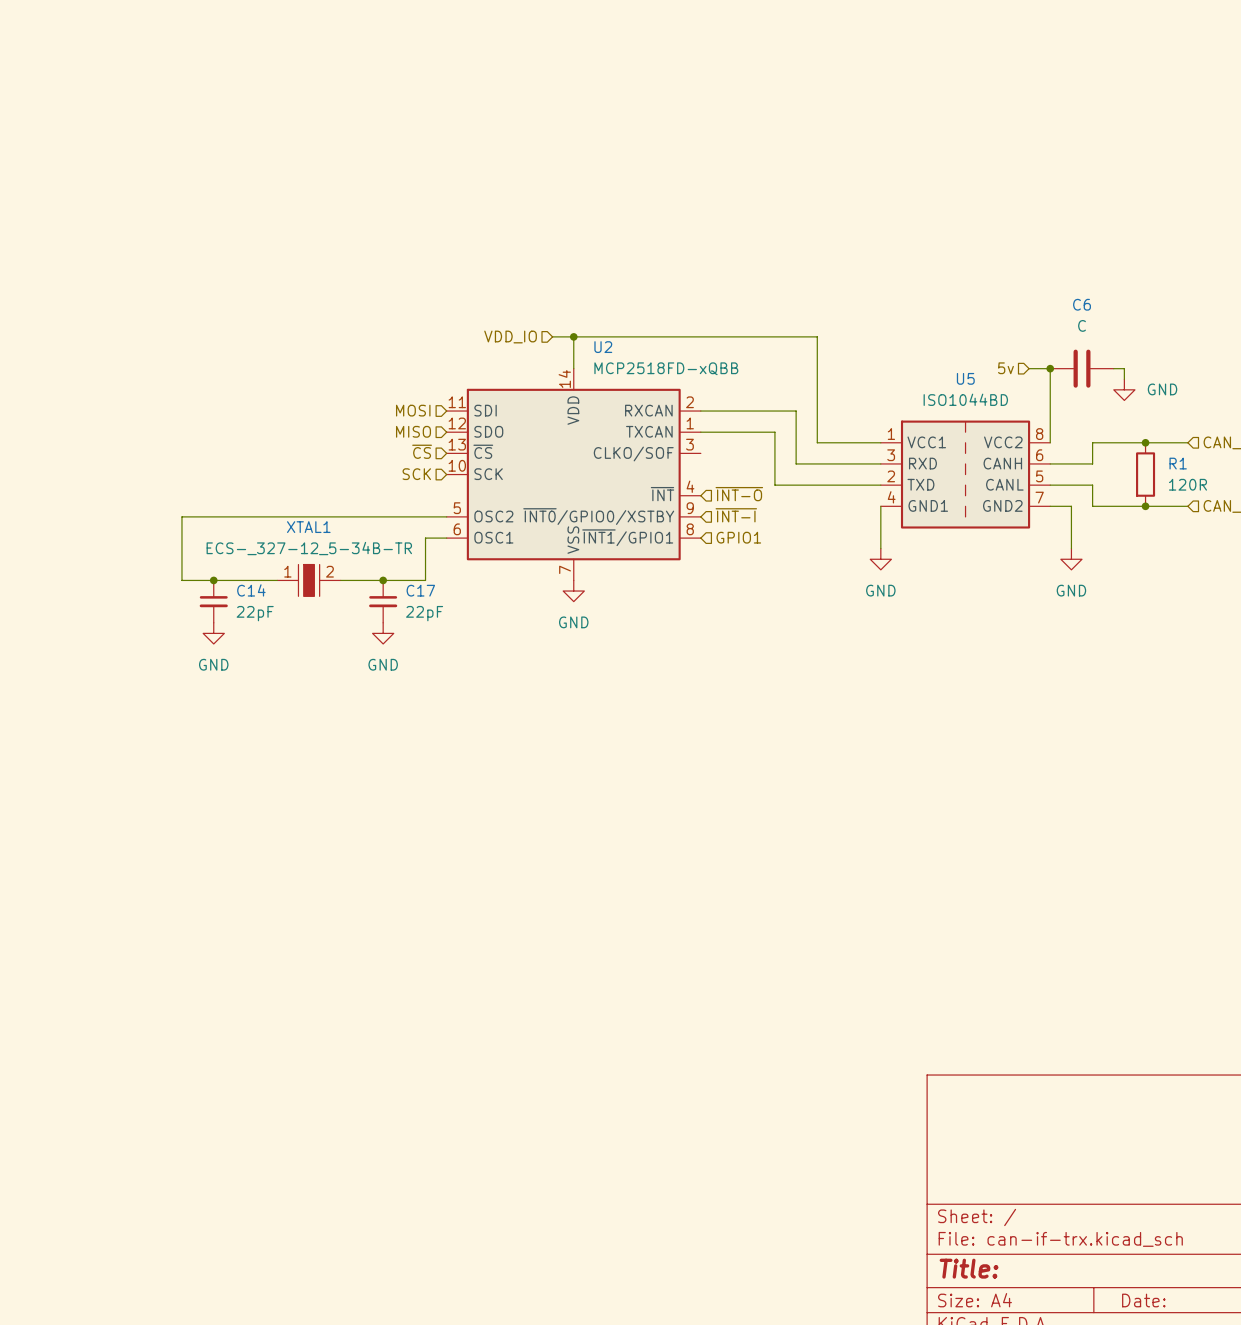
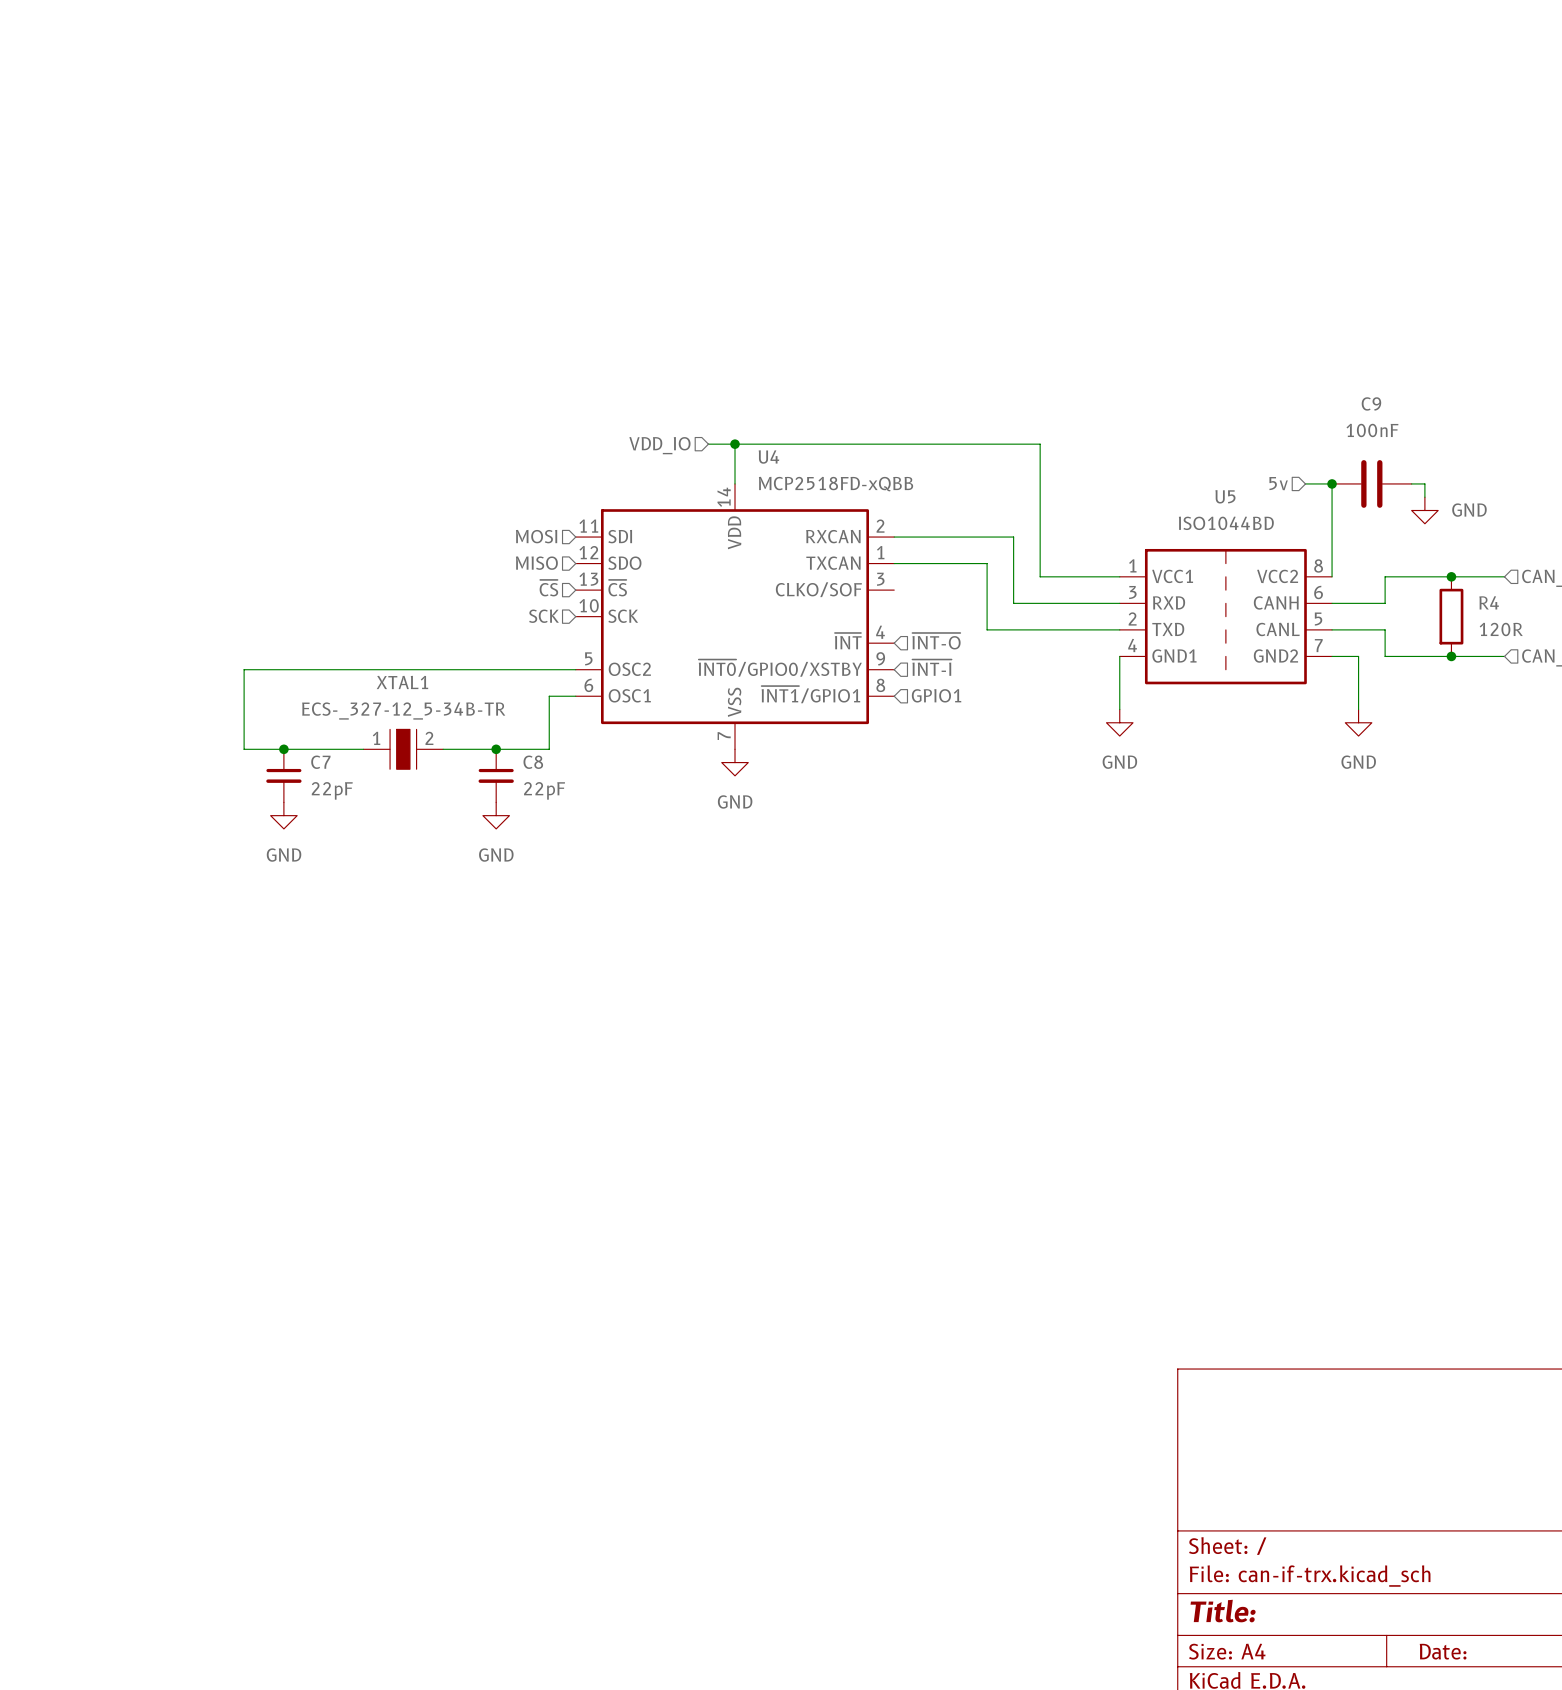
C6 name: C6 (1082, 304) -> C9 (1371, 403)
C6 value: C (1082, 325) -> 100nF (1372, 430)
U2 name: U2 (603, 347) -> U4 (768, 457)
R1 name: R1 (1178, 463) -> R4 (1489, 602)
C14 name: C14 (251, 590) -> C7 (320, 762)
C17 name: C17 (420, 590) -> C8 (533, 762)

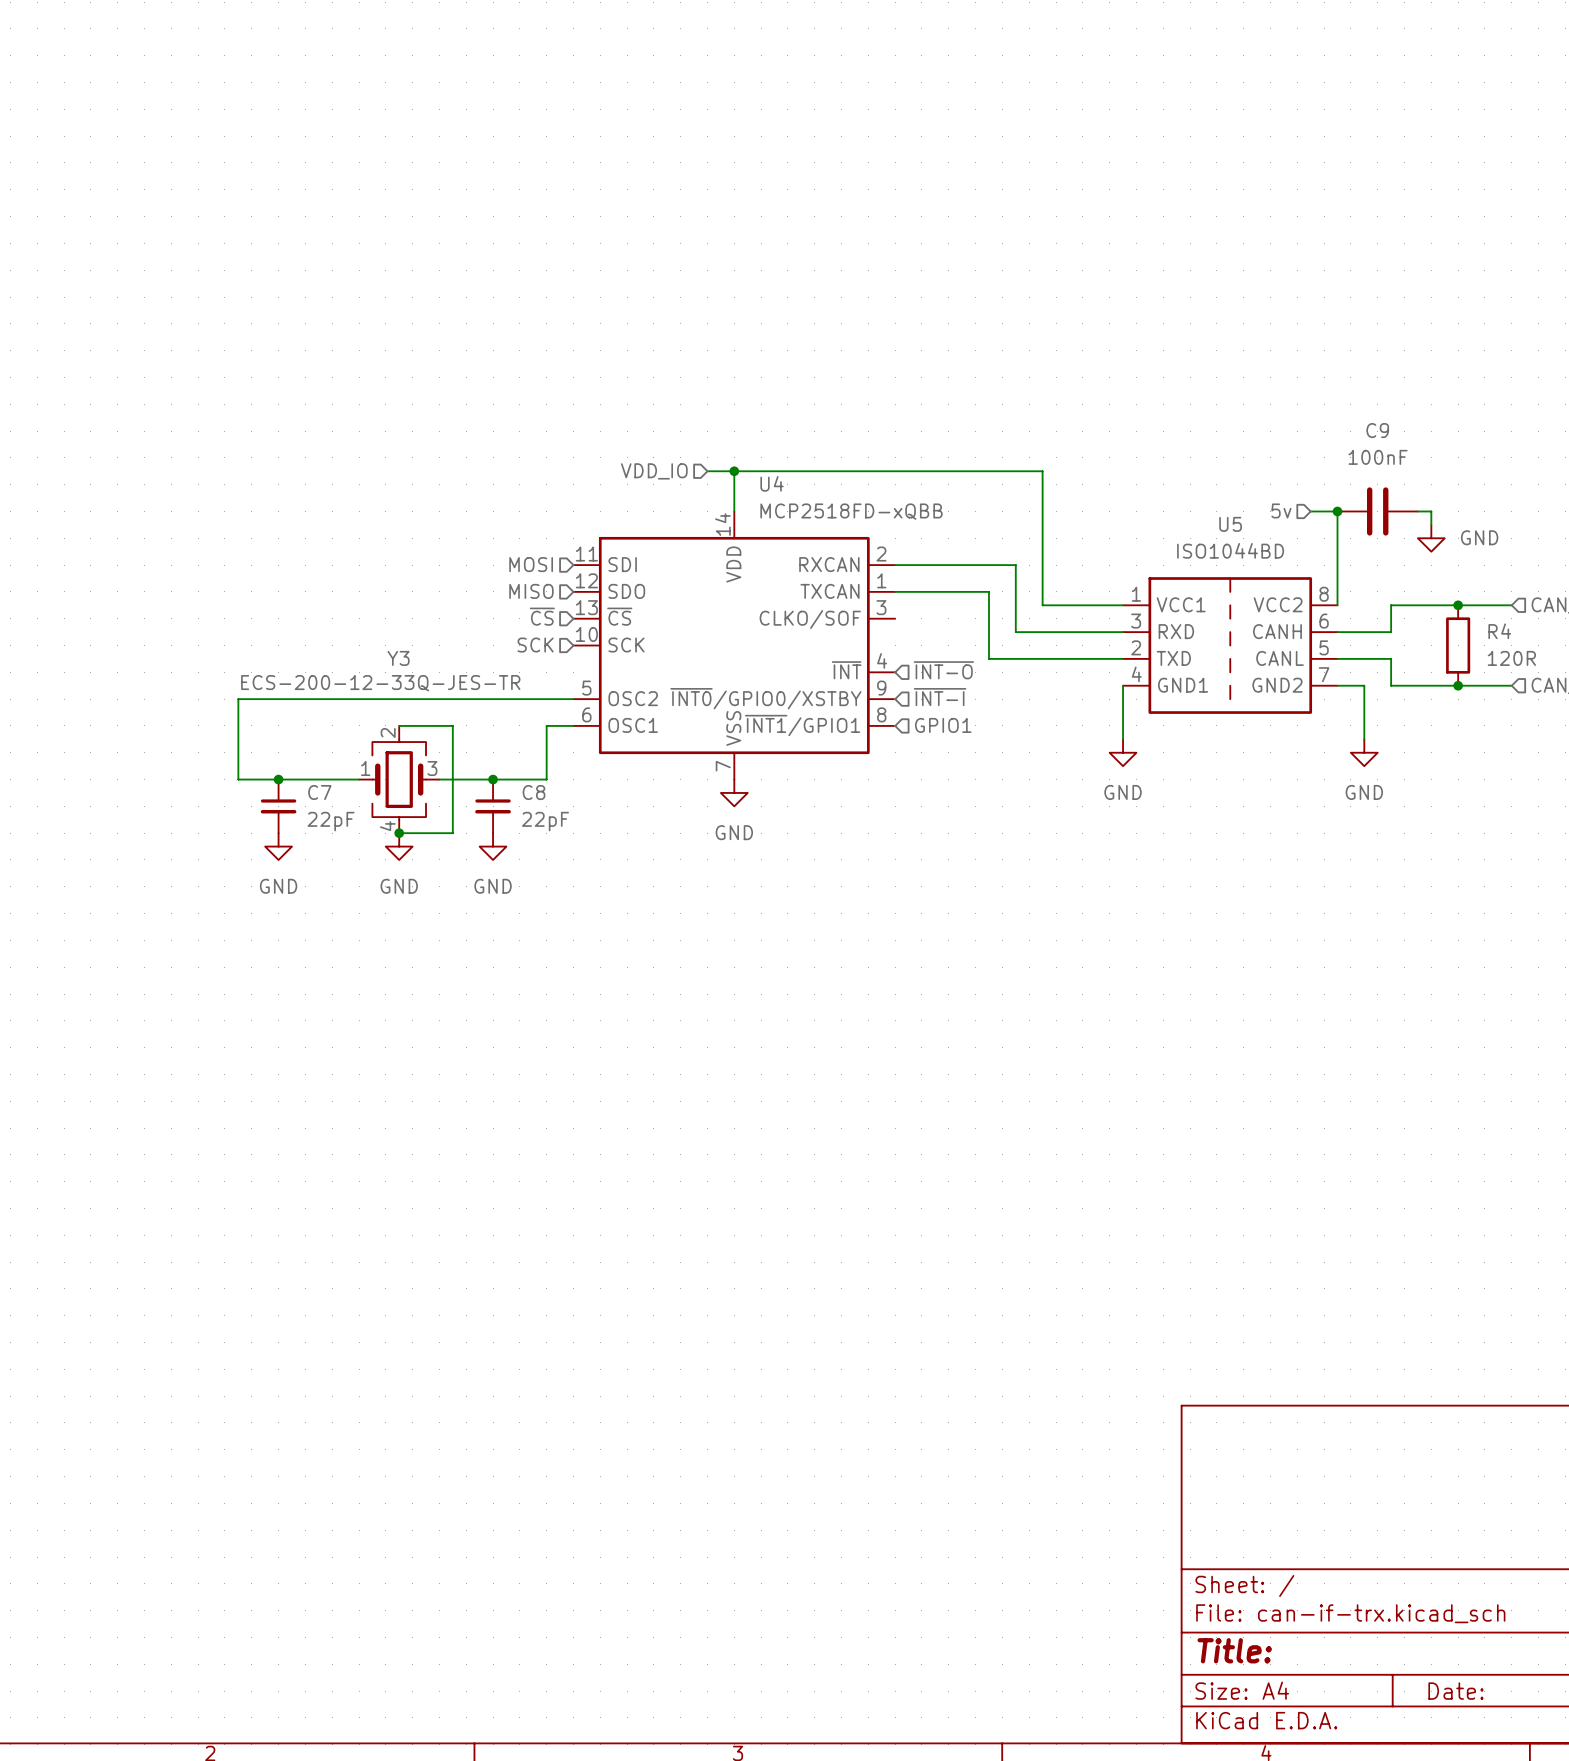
wire: none -> (399, 725) (452, 725) (452, 833) (399, 833)
XTAL1: ECS-_327-12_5-34B-TR (403, 749) -> none
Y3: none -> ECS-200-12-33Q-JES-TR (399, 779)
junction: none -> (399, 833)
power symbol: none -> GND (399, 846)

